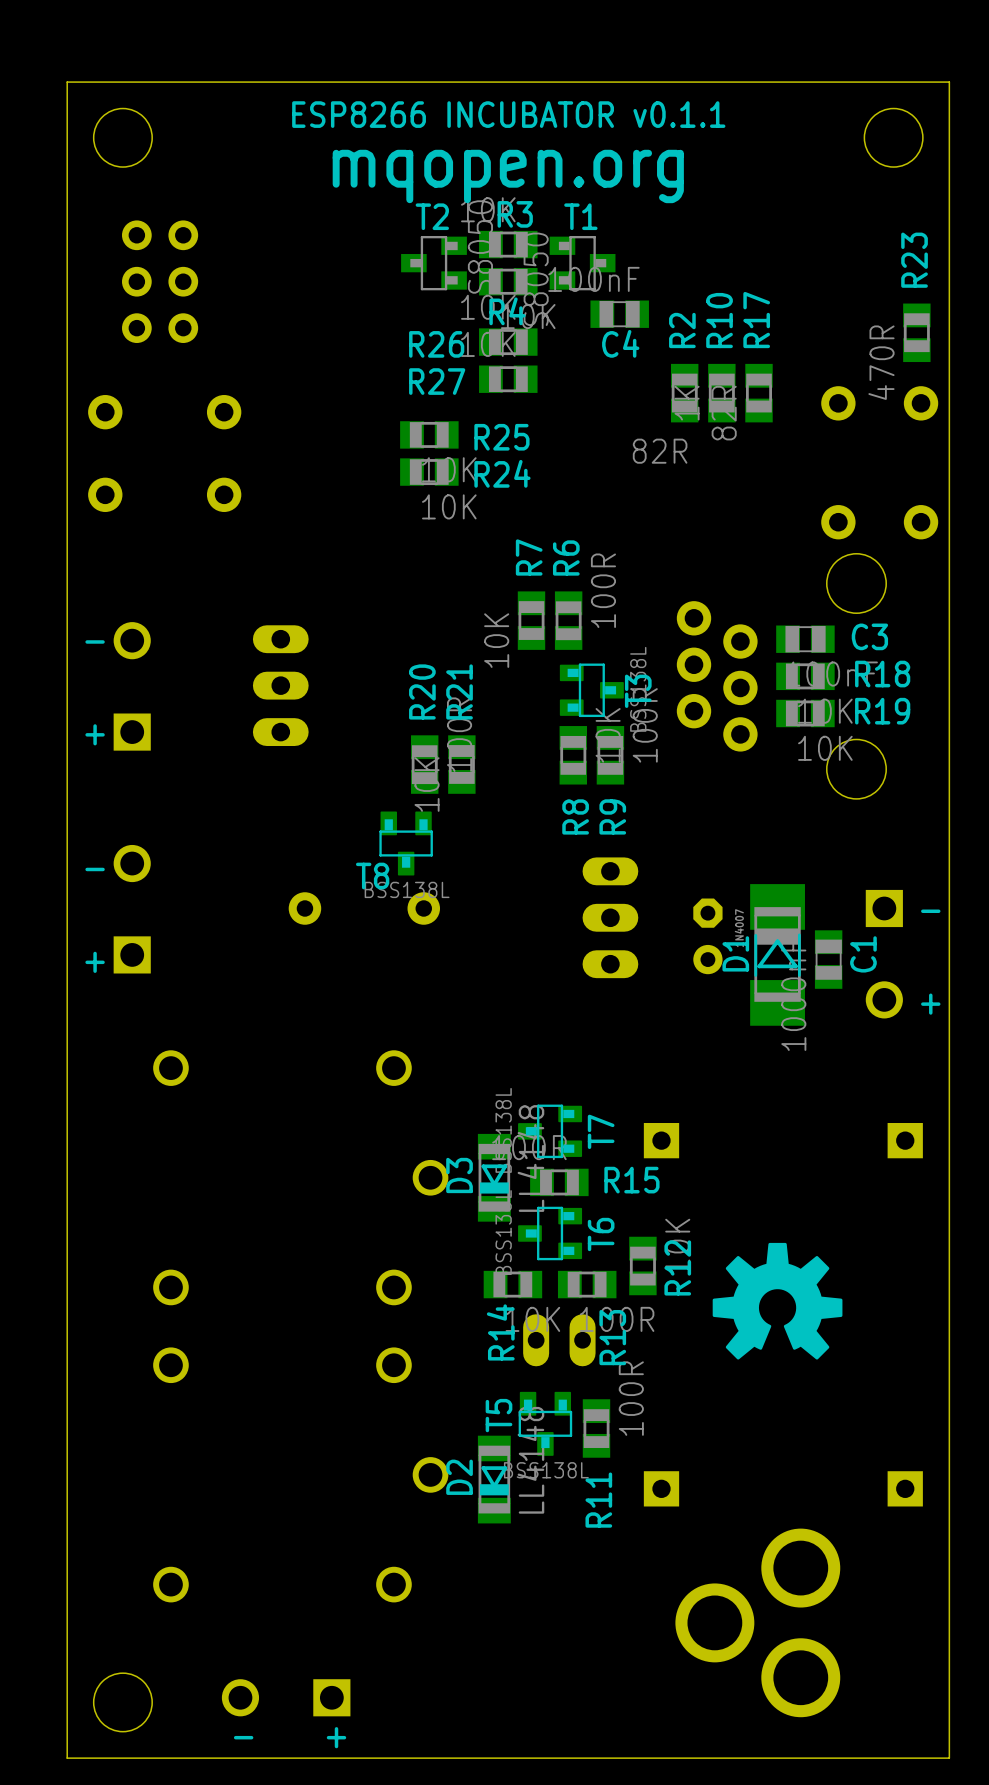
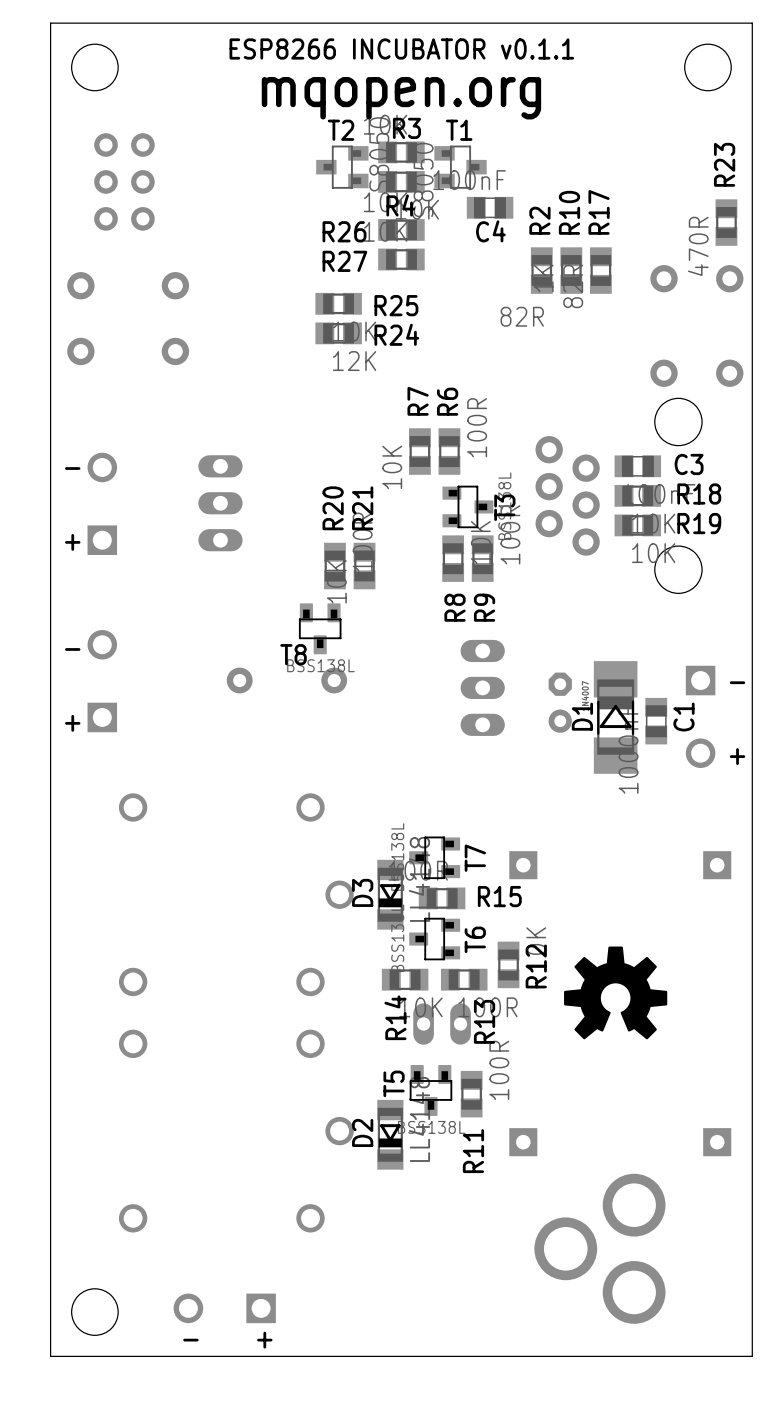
R24 value: 10K (449, 506) -> 12K (354, 361)

